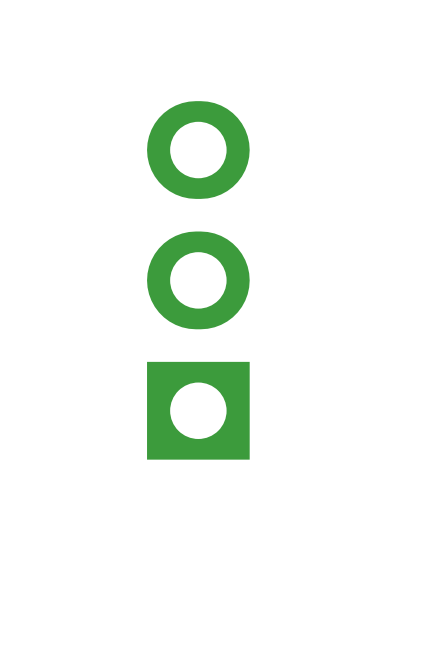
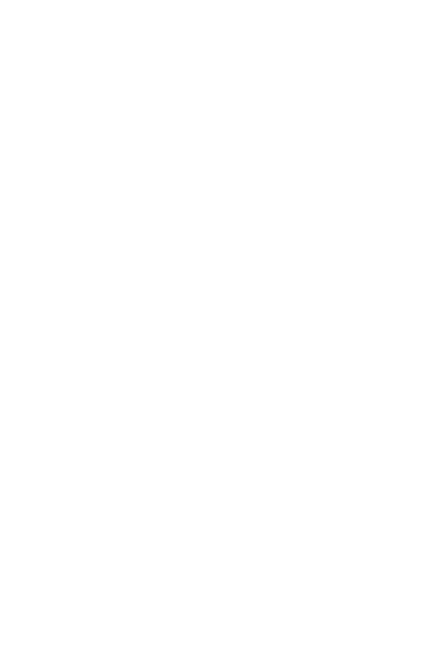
part: (198, 280) -> none

